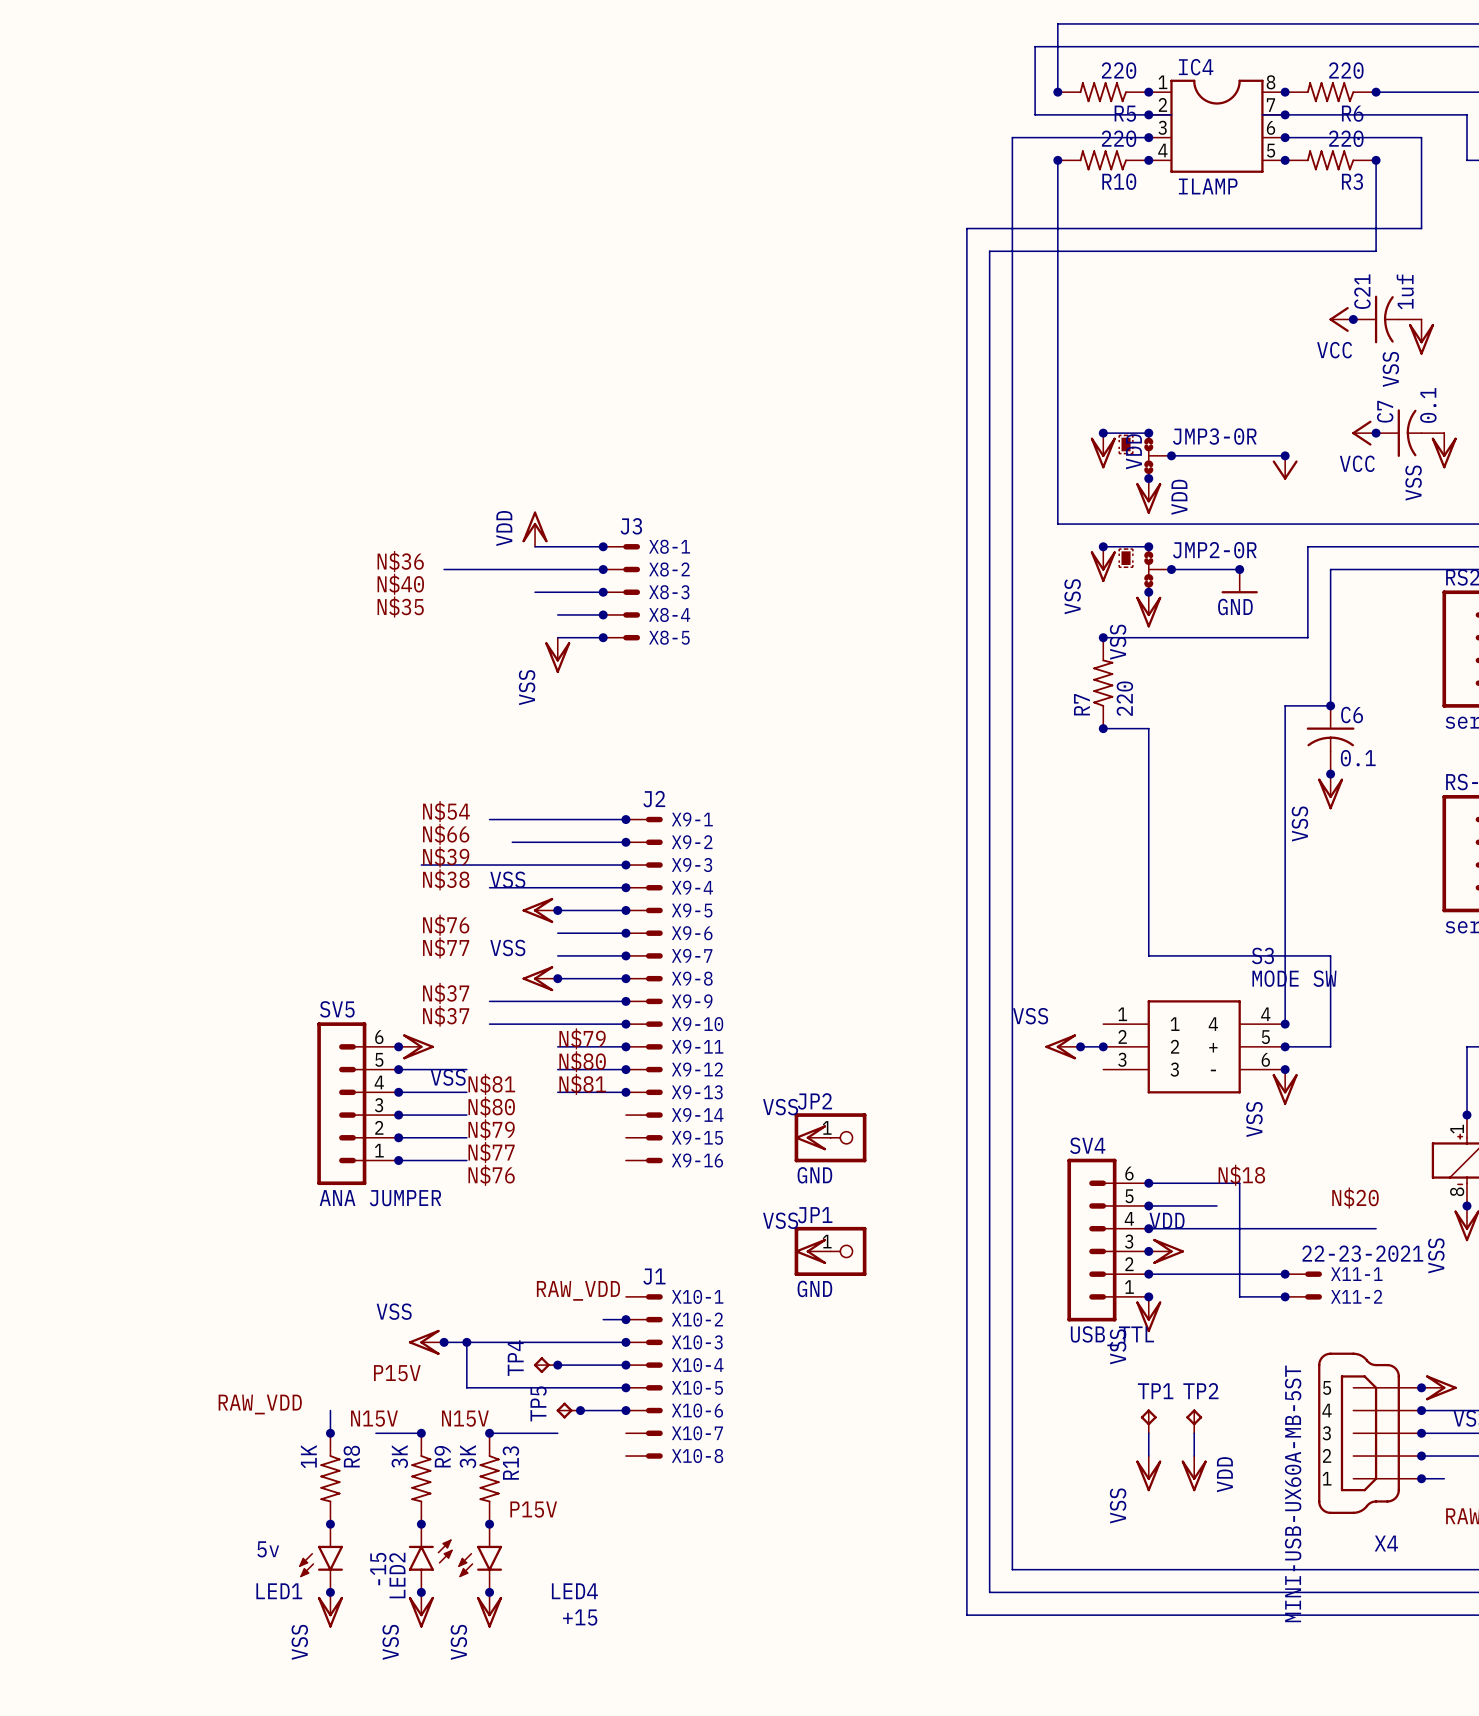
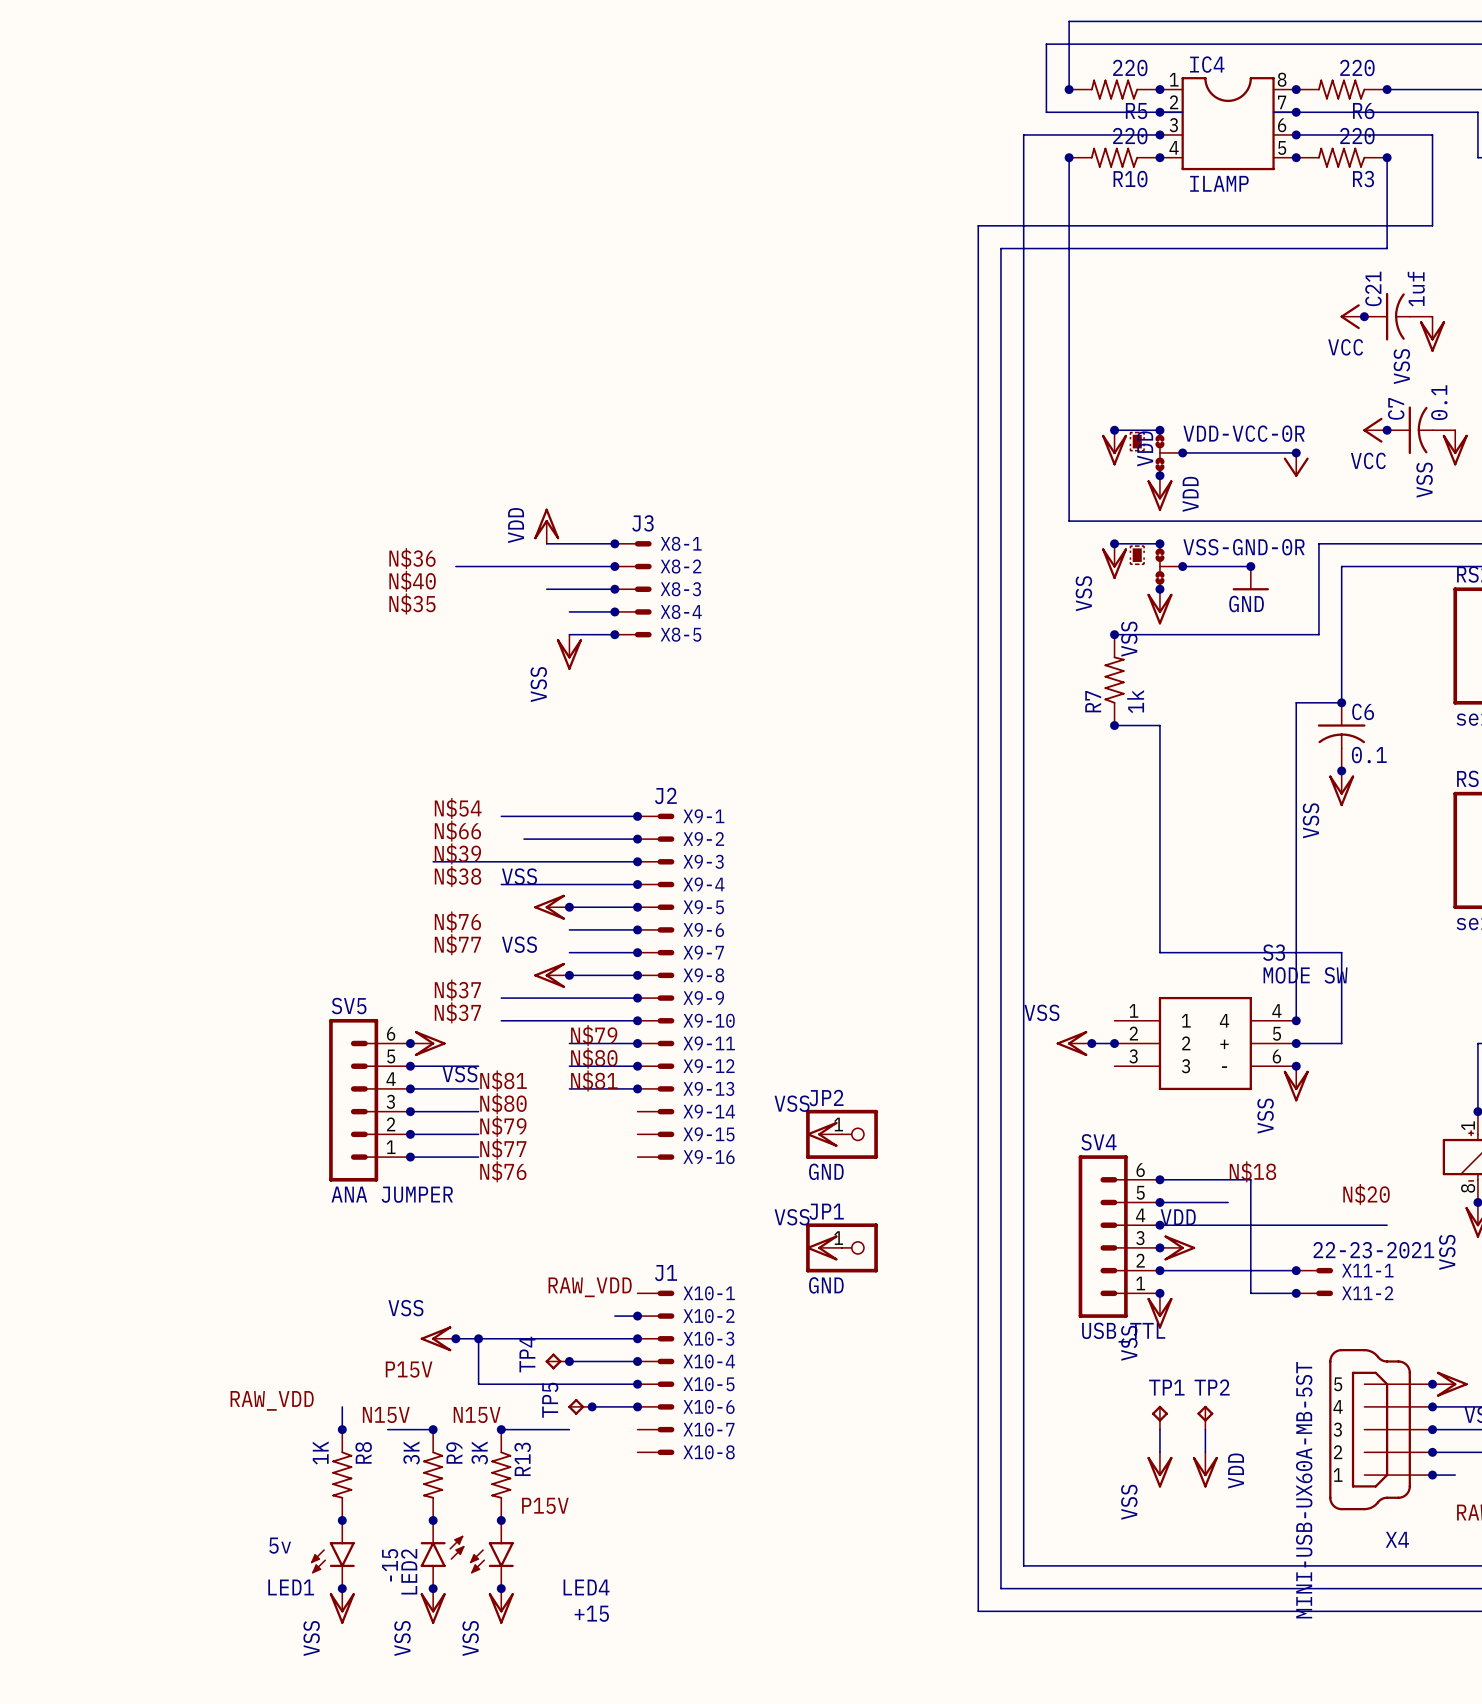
JMP3-0R name: JMP3-0R (1214, 436) -> VDD-VCC-0R (1244, 433)
JMP2-0R name: JMP2-0R (1214, 550) -> VSS-GND-0R (1244, 547)
R7 value: 220 (1124, 698) -> 1k (1135, 701)

